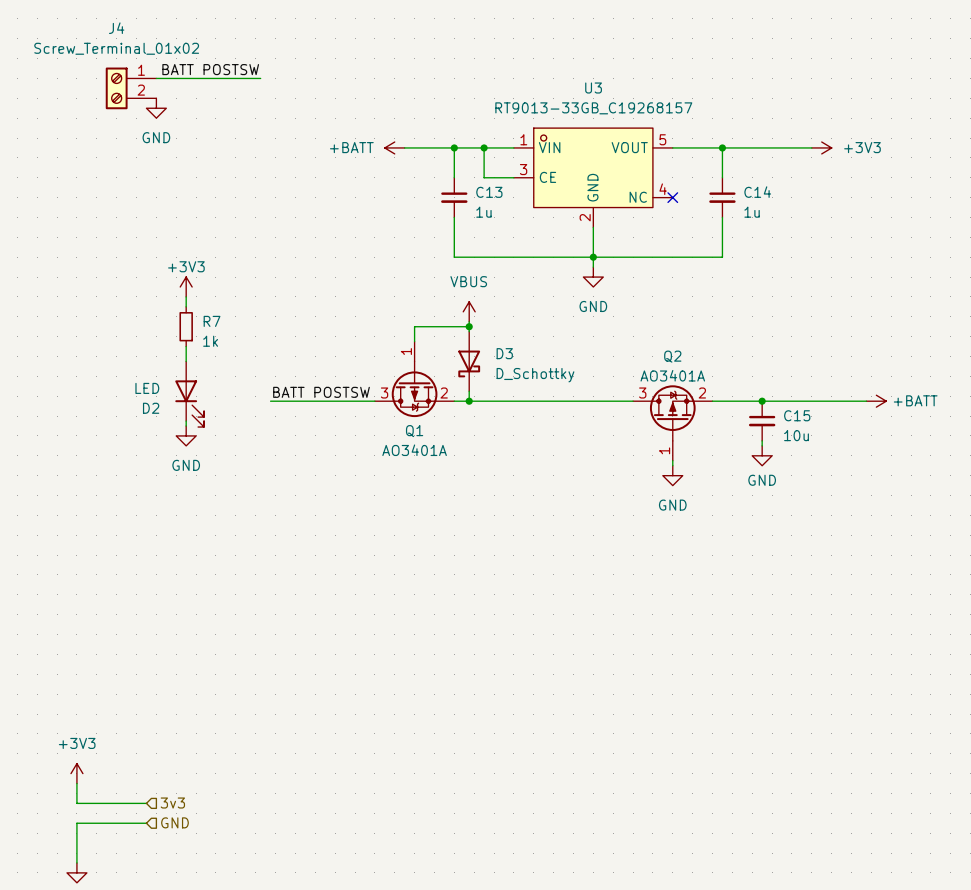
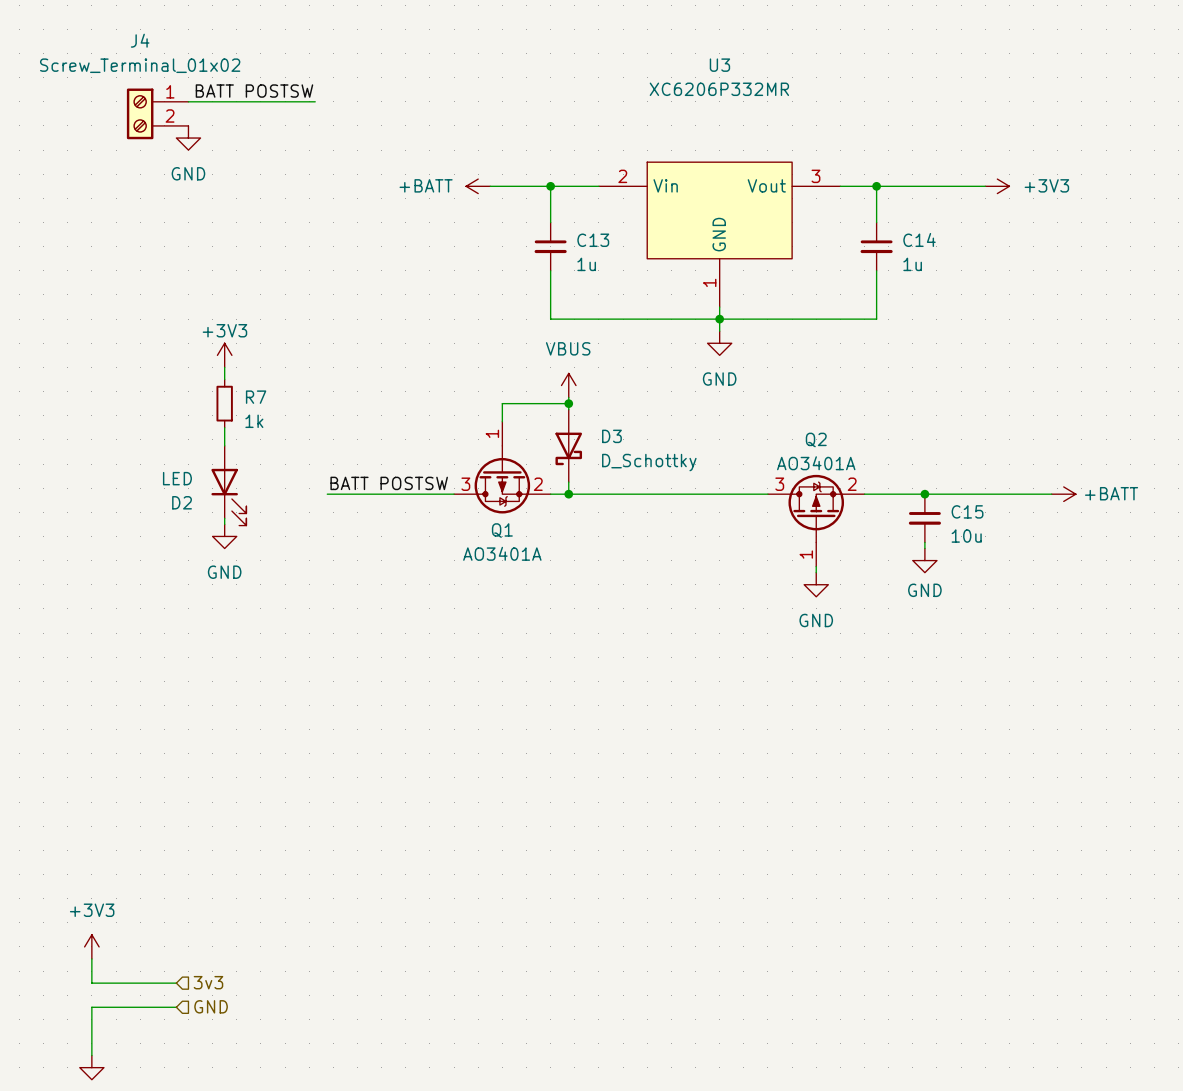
U3 name position: U3 (593, 88) -> U3 (719, 65)
U3 value: RT9013-33GB_C19268157 (593, 108) -> XC6206P332MR (719, 89)
U3 symbol: [513, 128, 673, 228] -> [598, 162, 841, 308]
wire: (484, 147) (484, 177) (513, 177) -> none
junction: (484, 147) -> none
no-connect mark: (672, 197) -> none

